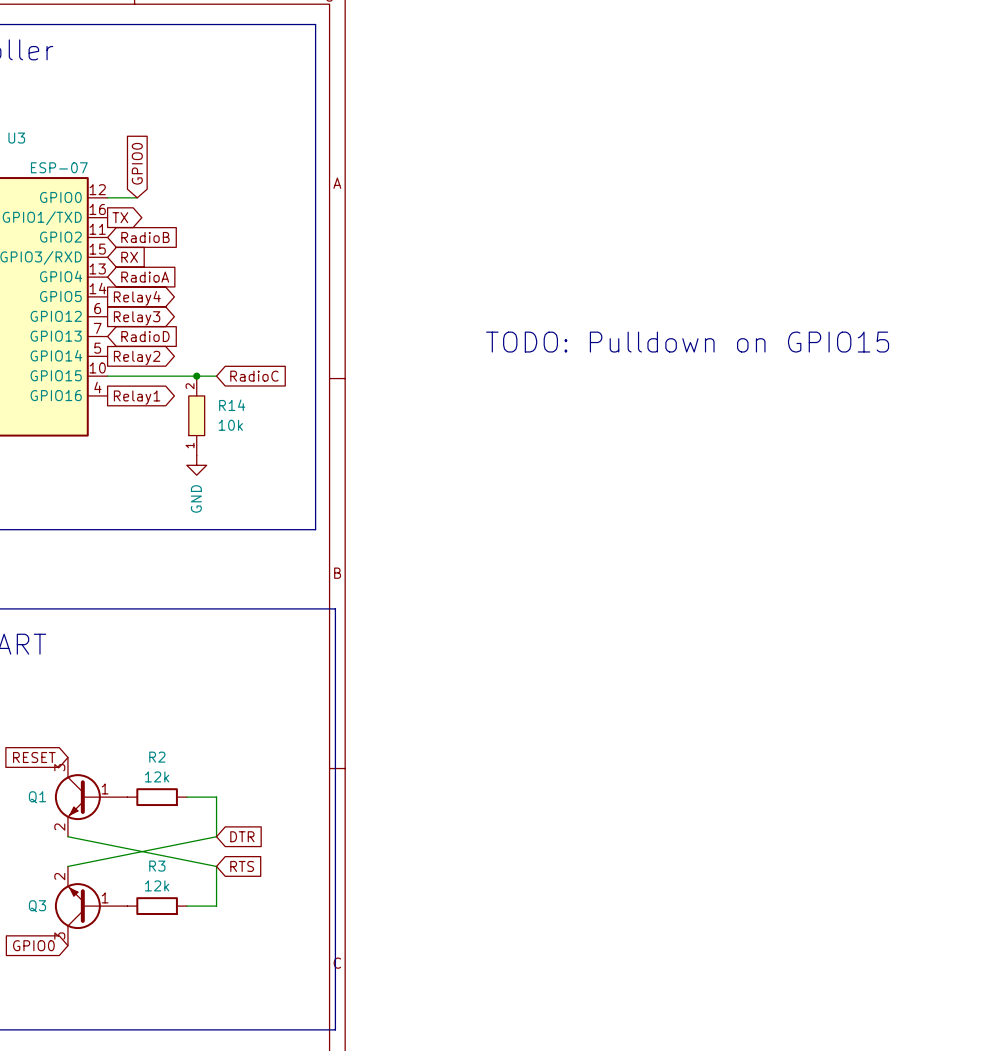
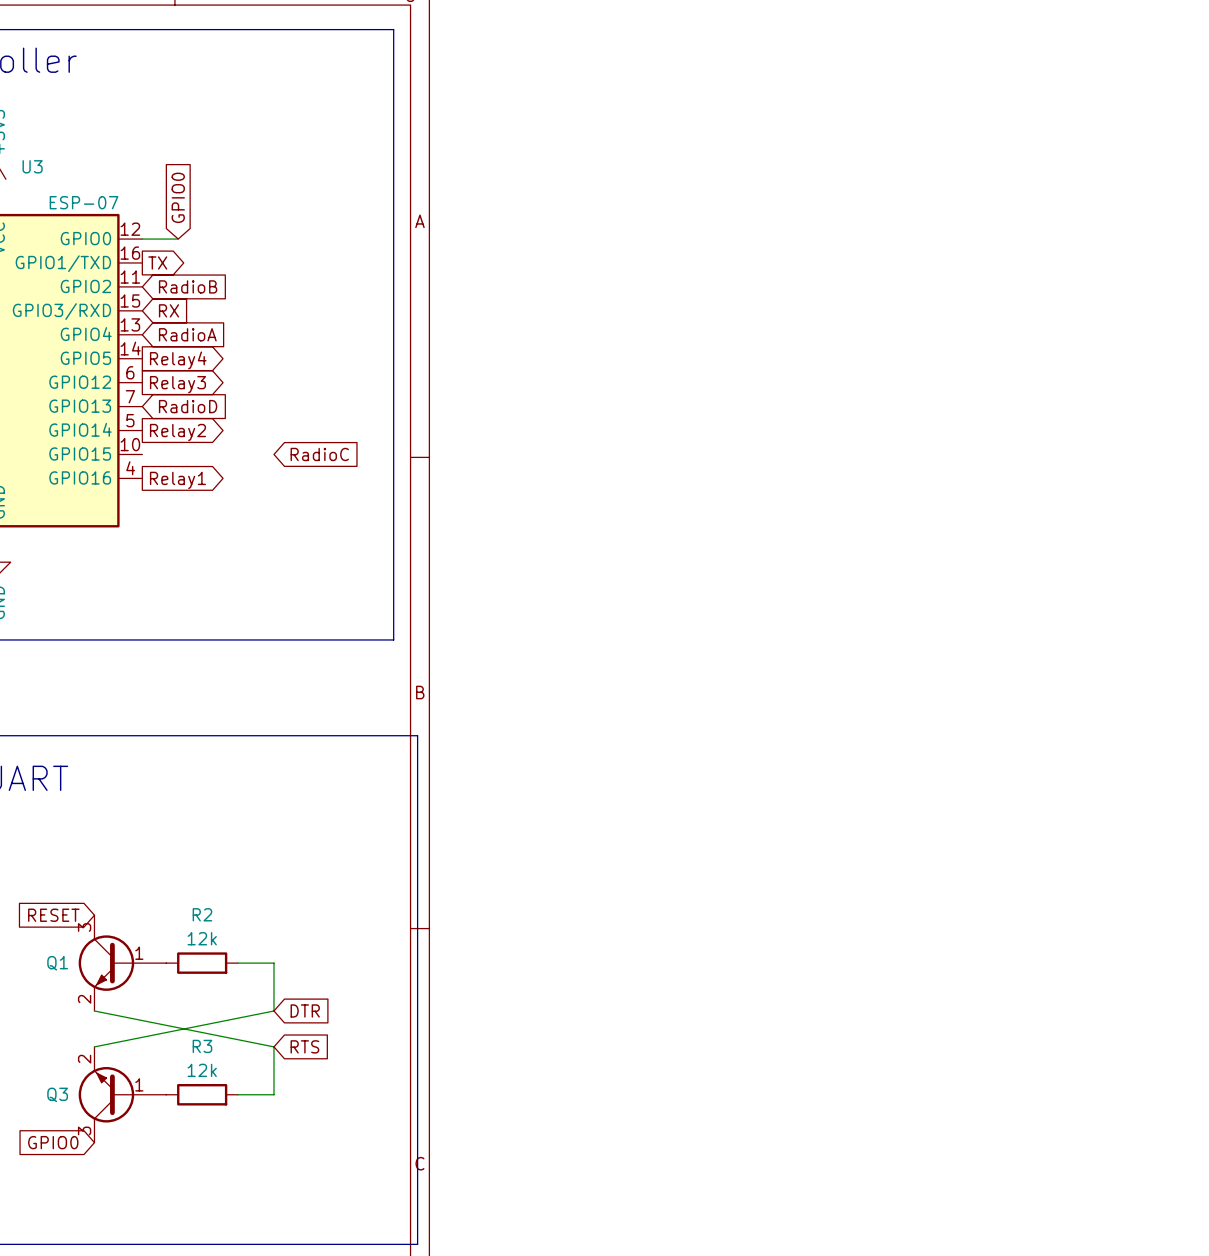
text: TODO: Pulldown on GPIO15 (687, 342) -> none
wire: (107, 376) (216, 376) -> none
junction: (196, 376) -> none
R14: 10k (196, 415) -> none
power symbol: GND (196, 465) -> none

